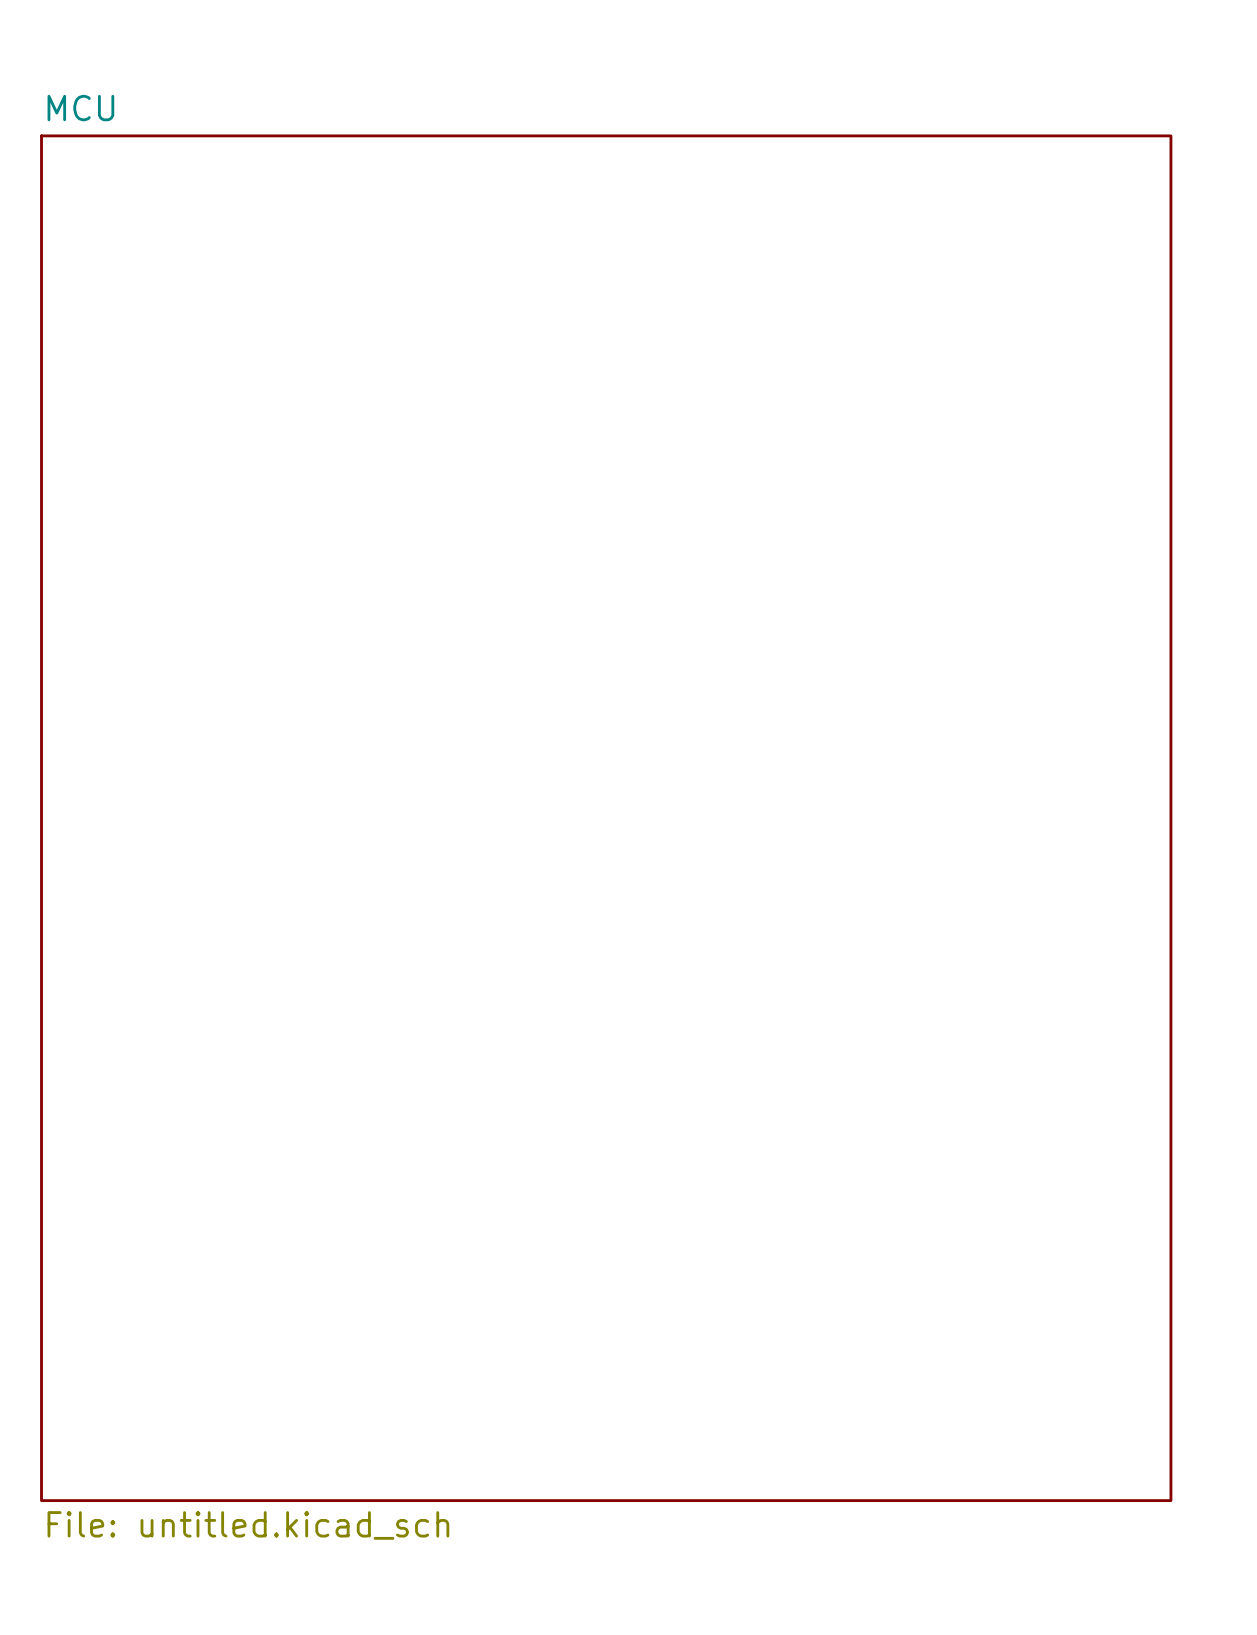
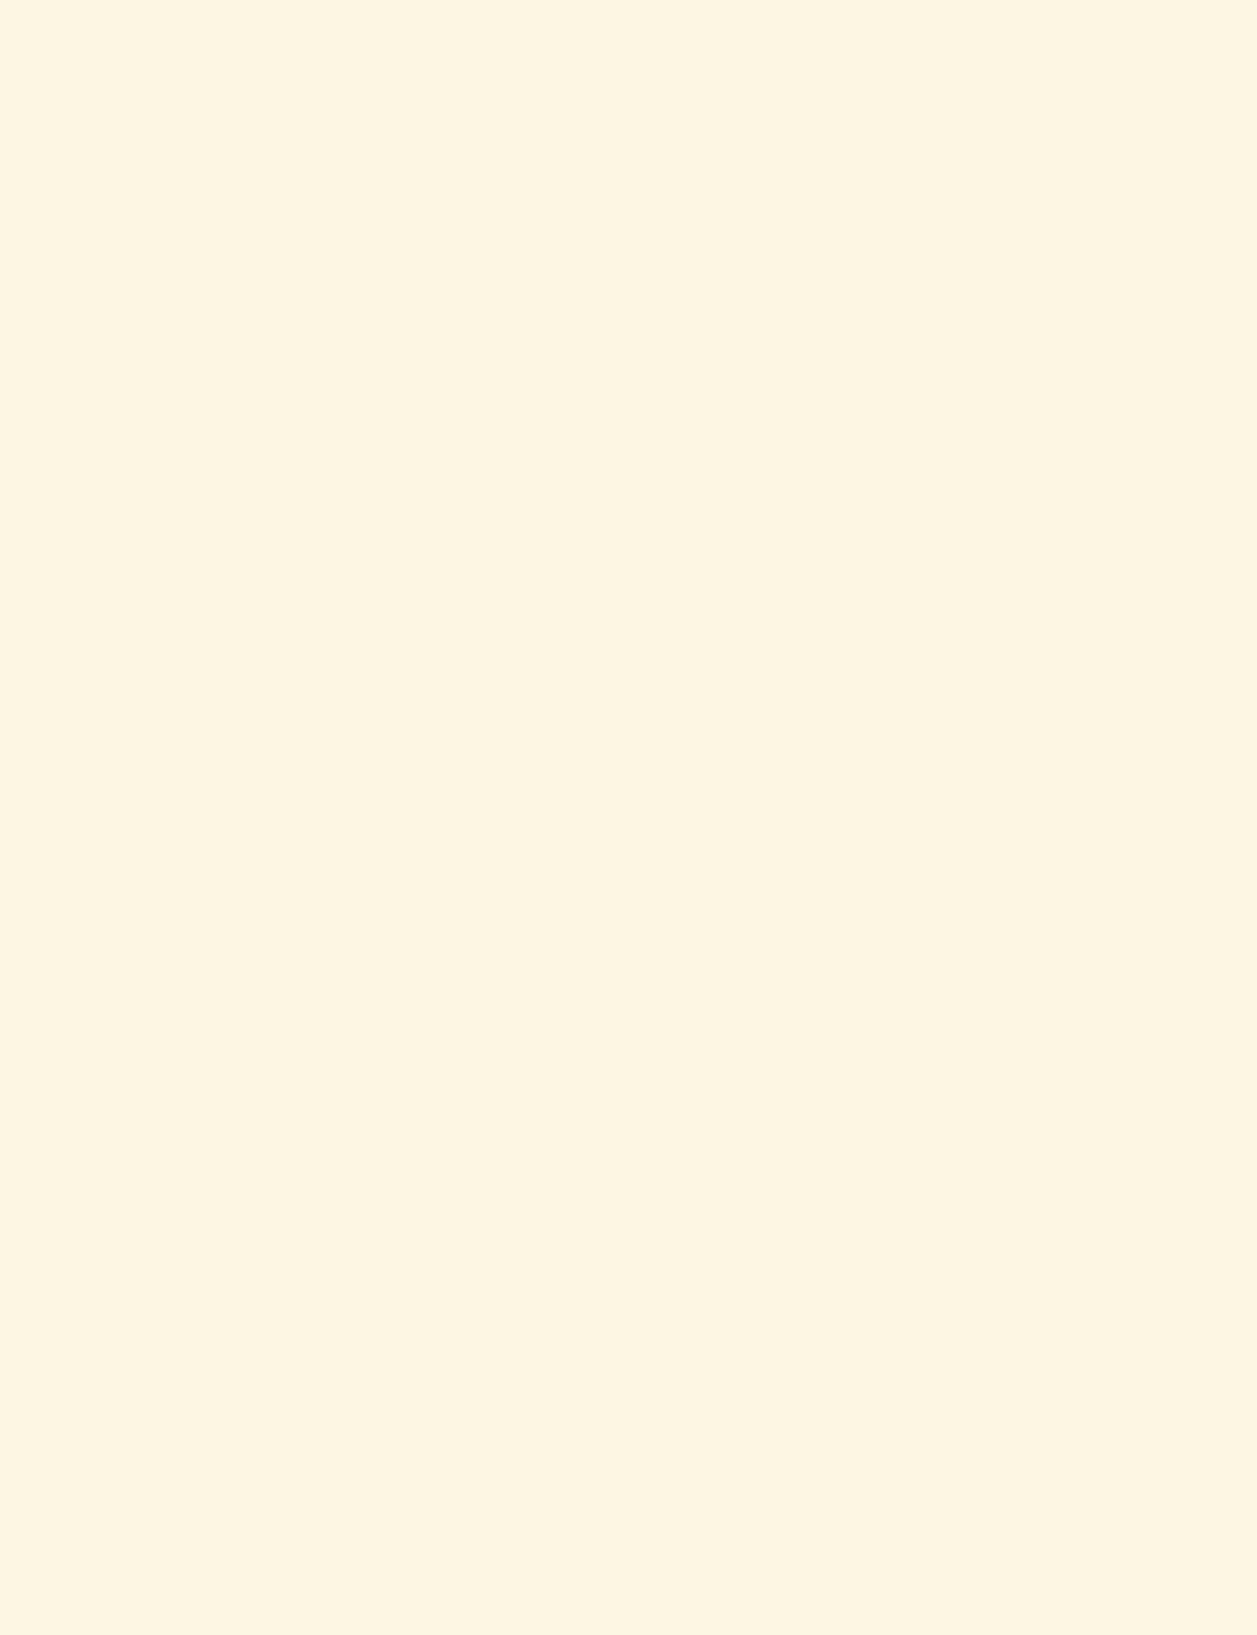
sheet MCU: File: untitled.kicad_sch (606, 818) -> none

